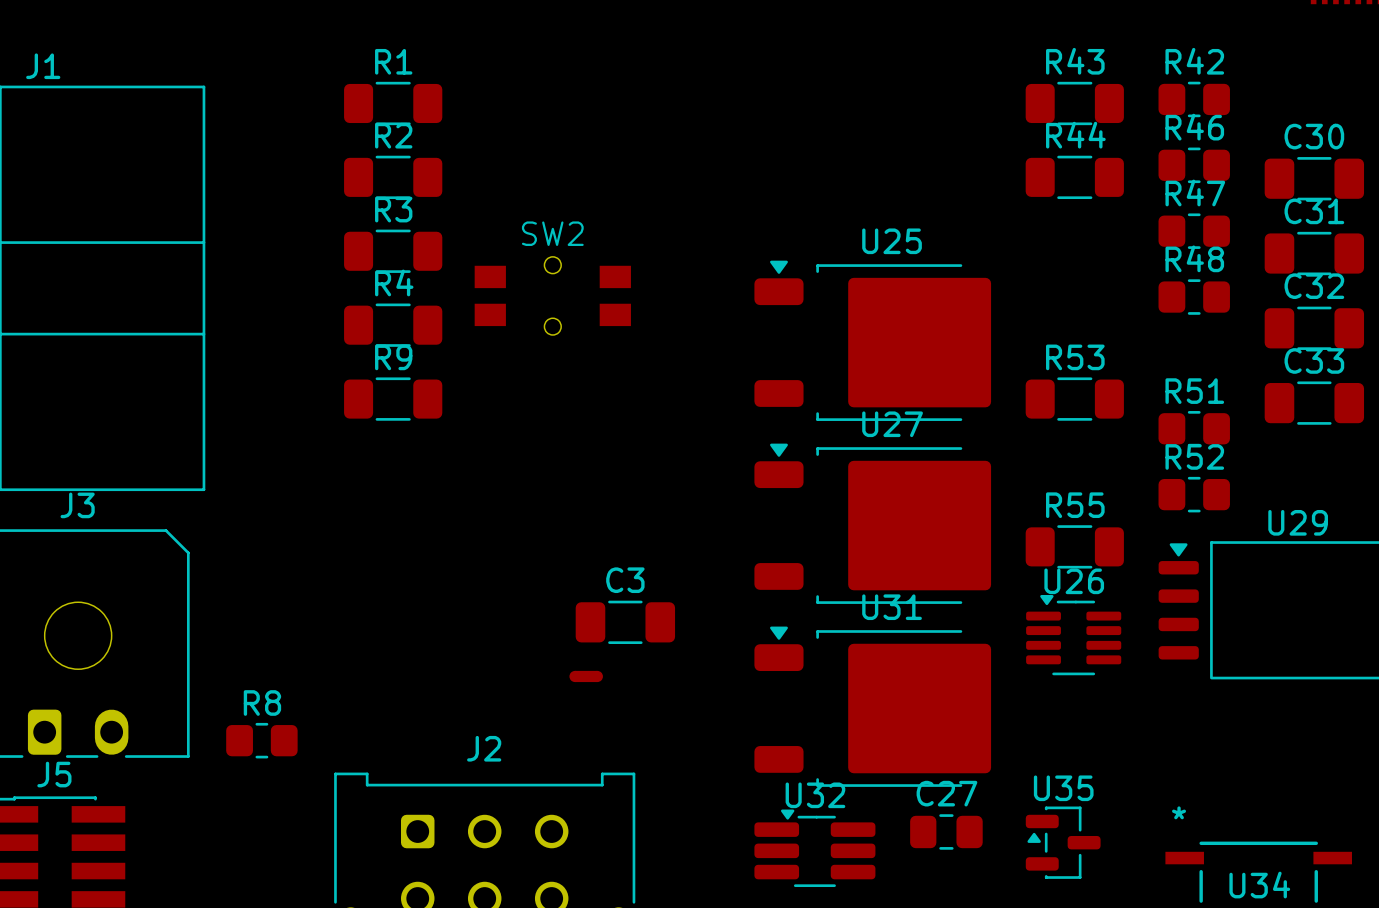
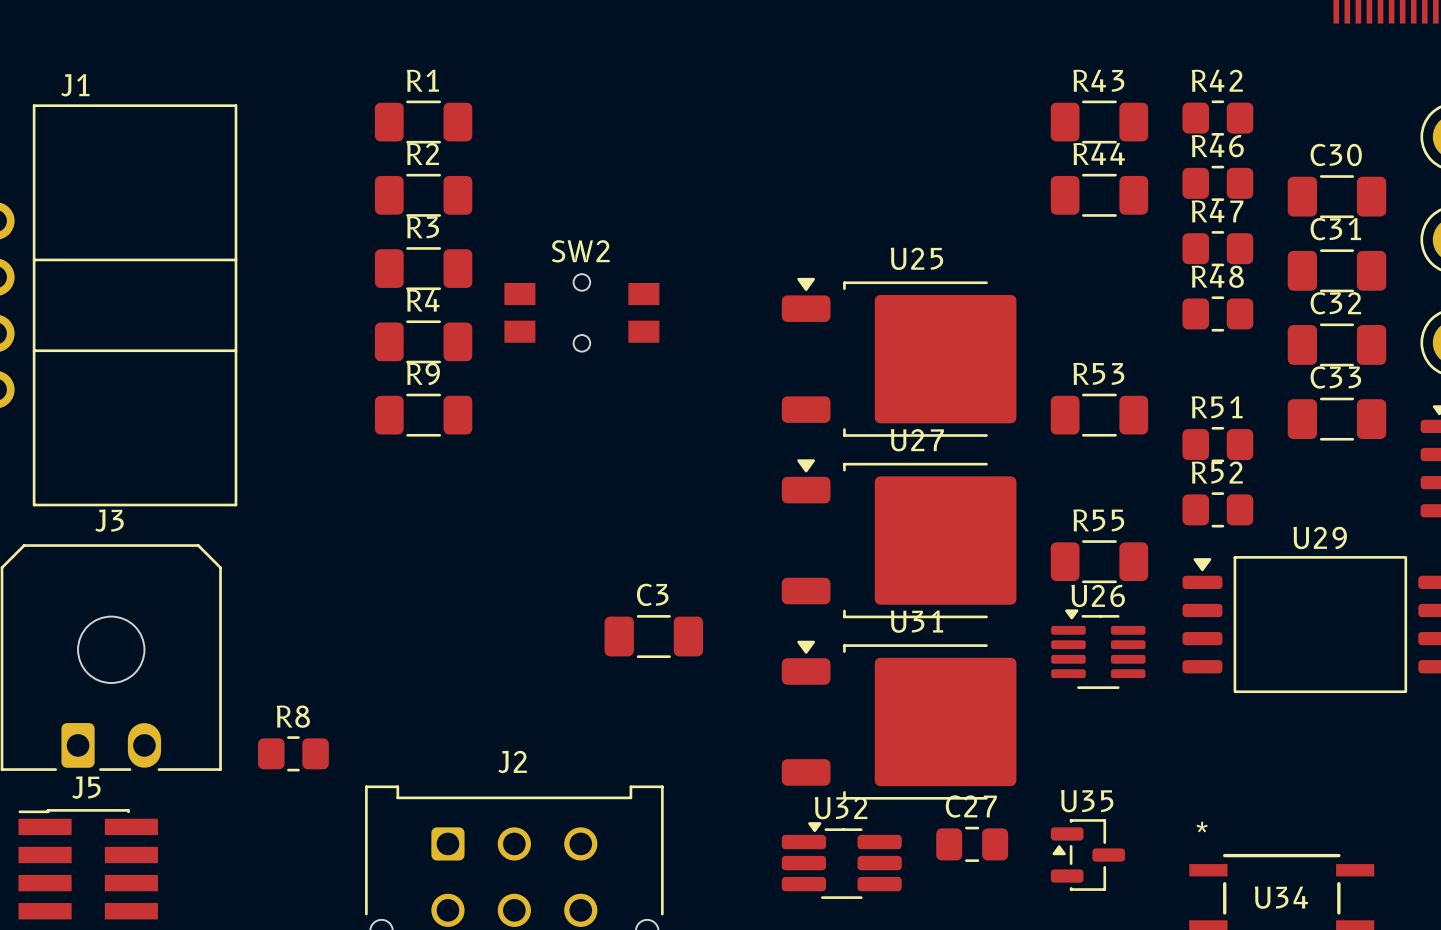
part: (586, 676) -> none

